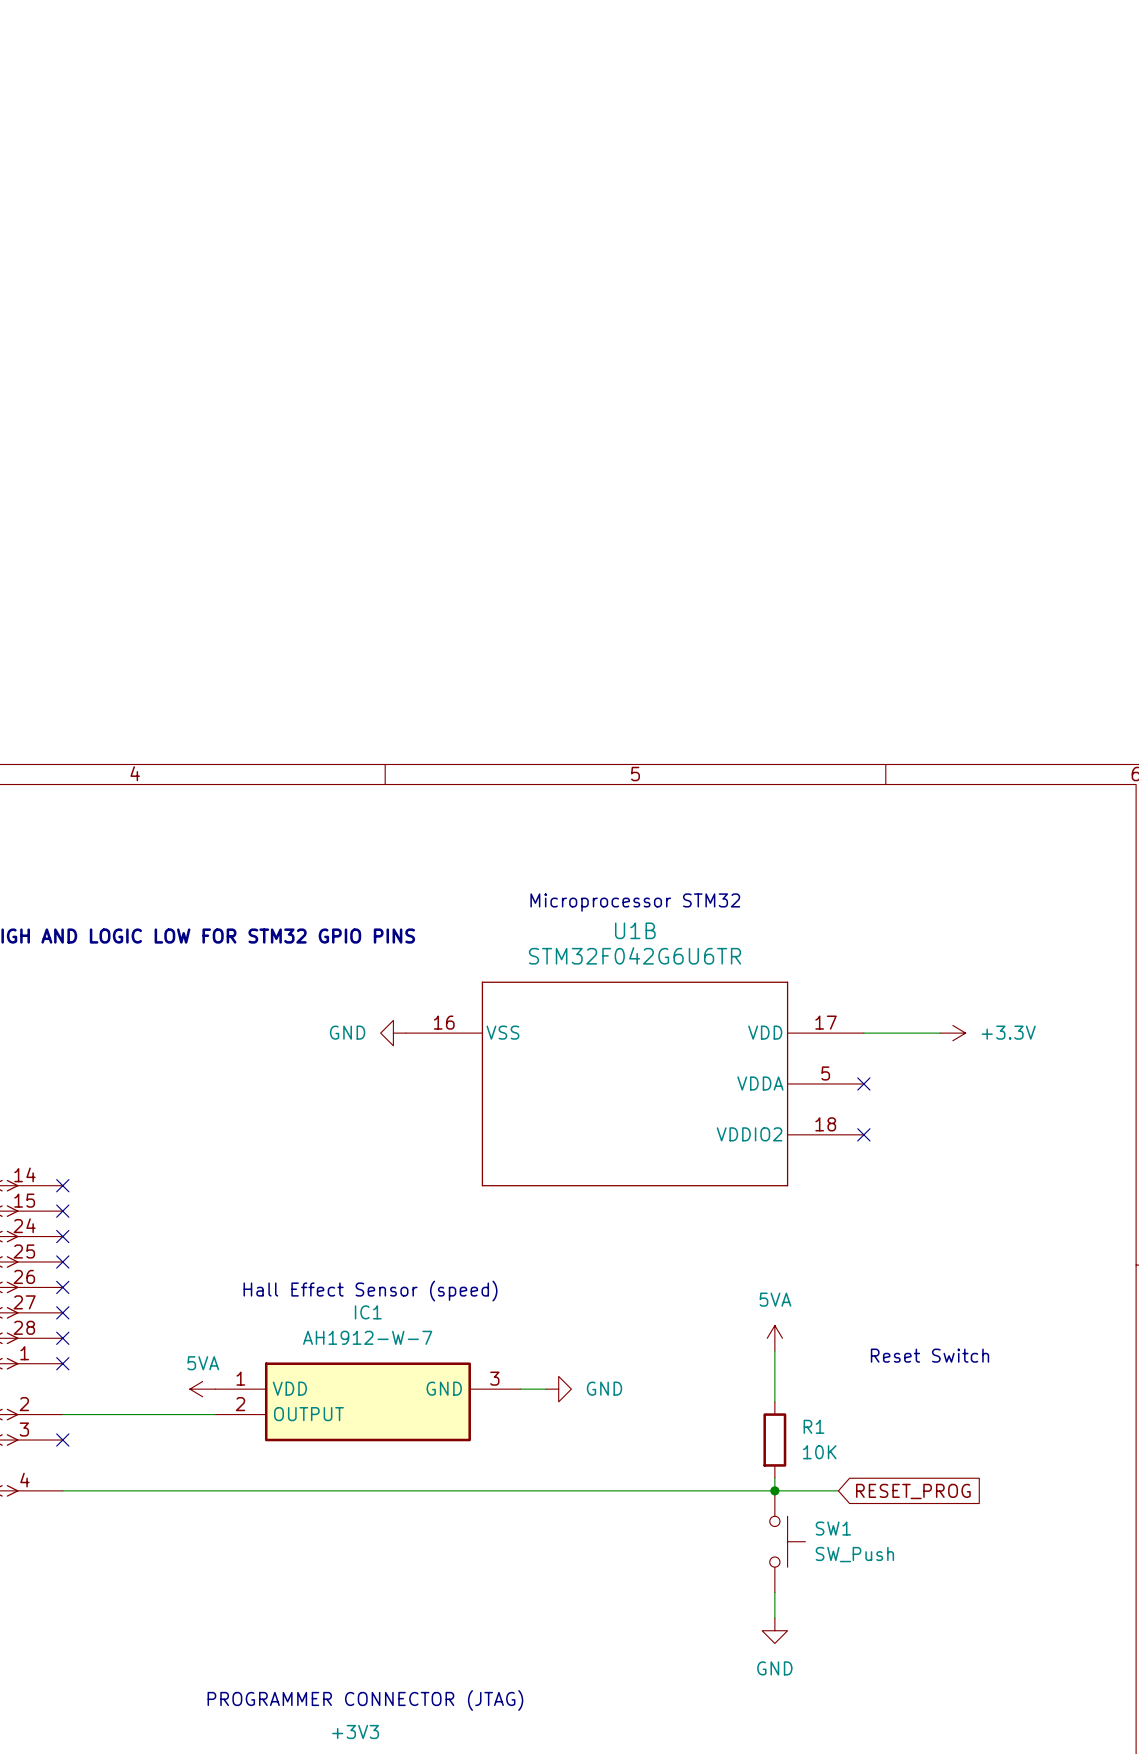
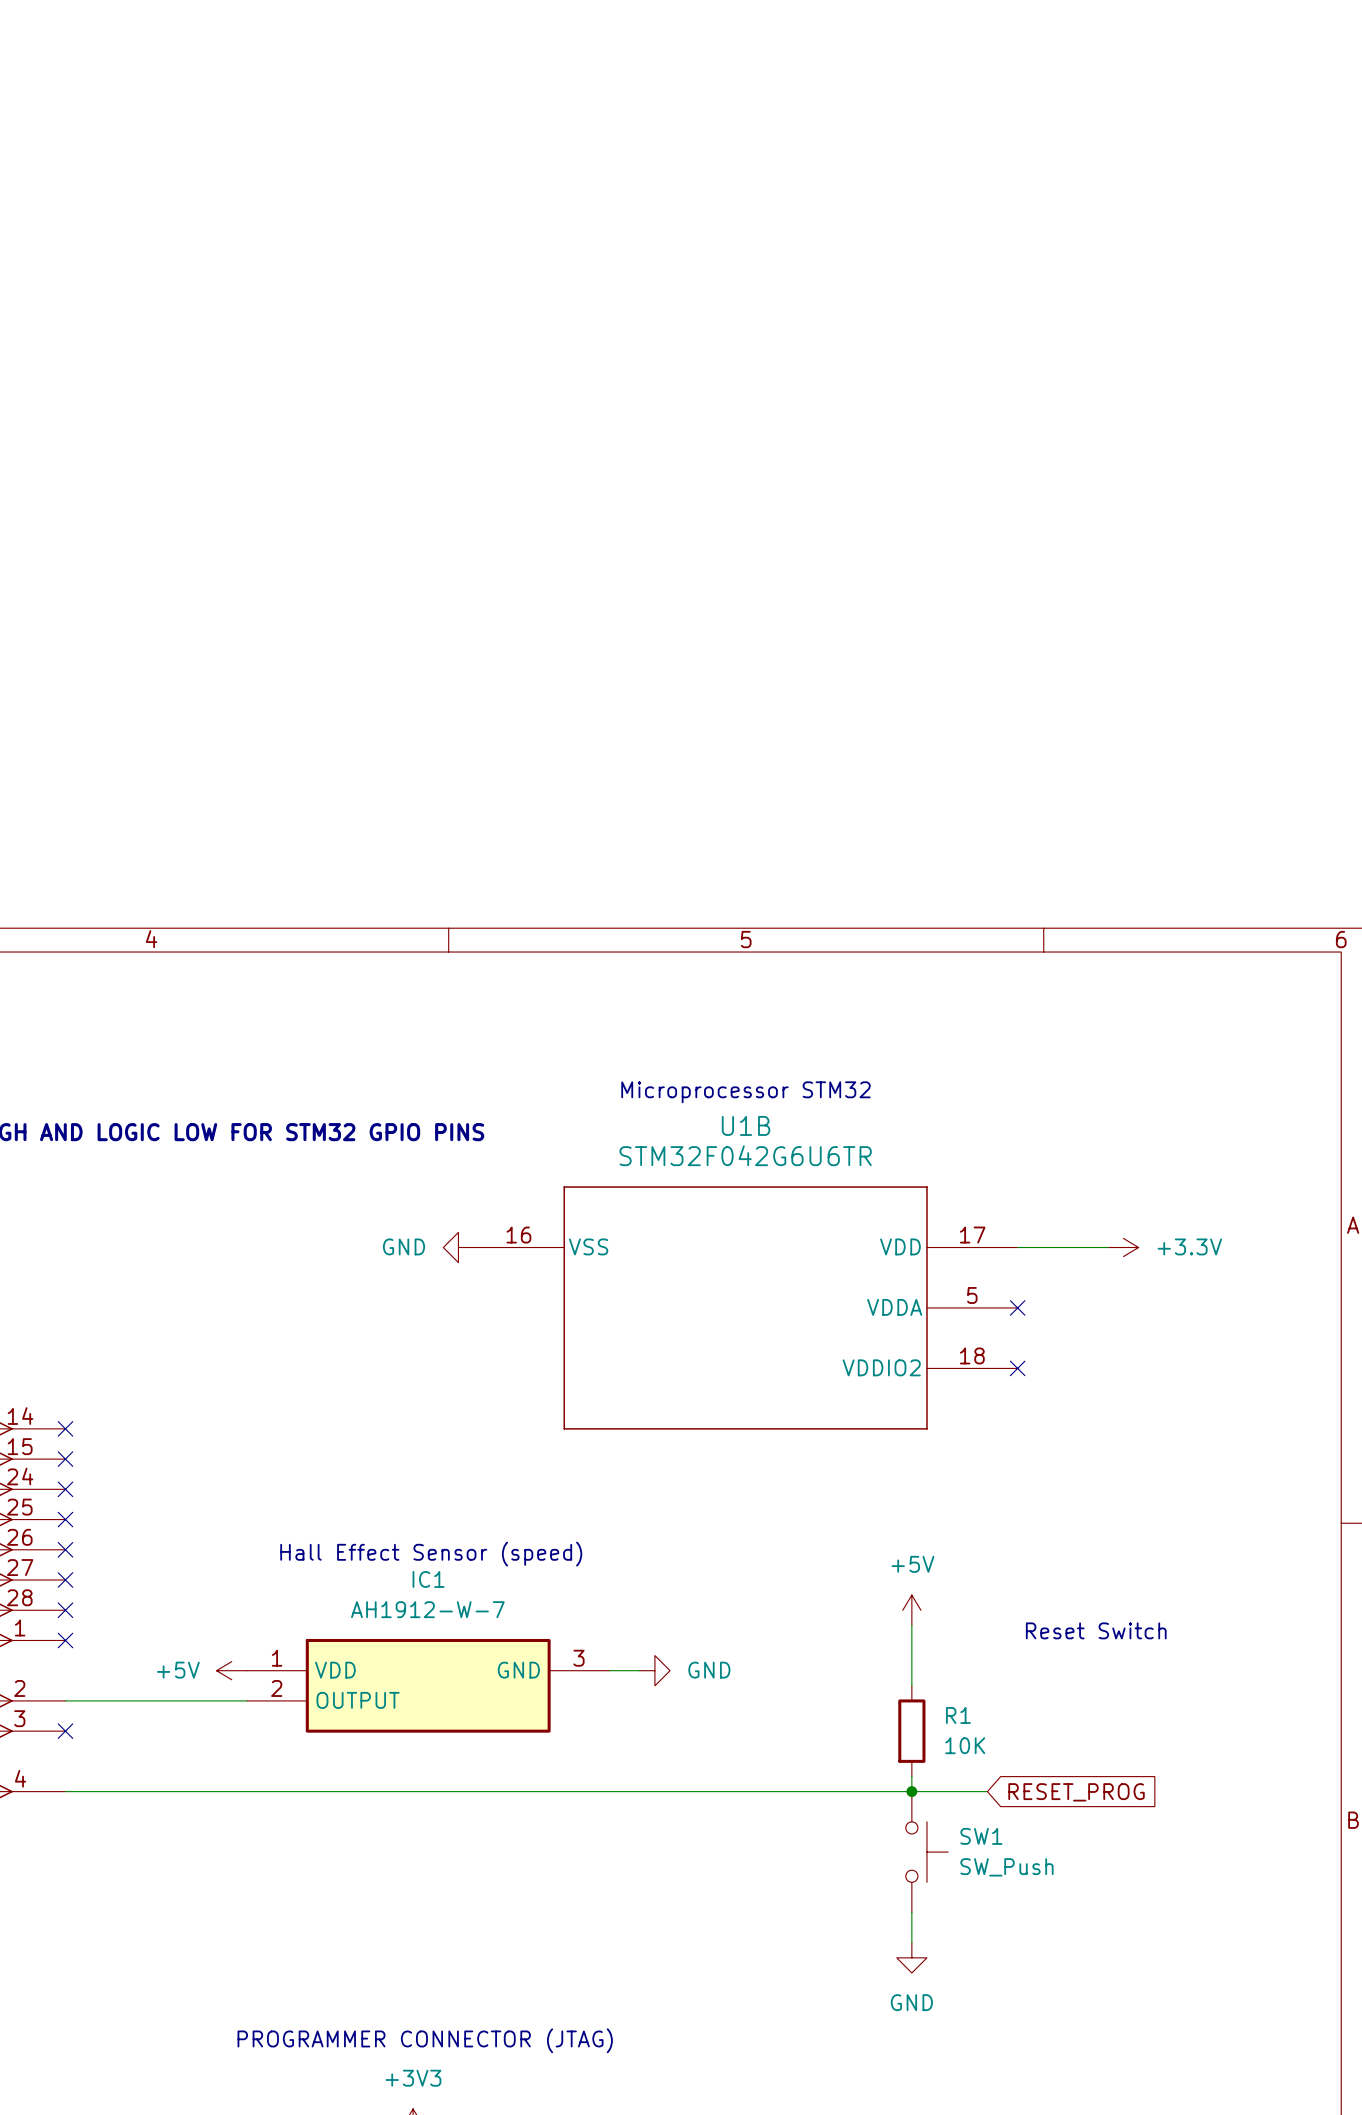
power symbol: 5VA (774, 1338) -> +5V (911, 1610)
power symbol: 5VA (202, 1389) -> +5V (231, 1670)

